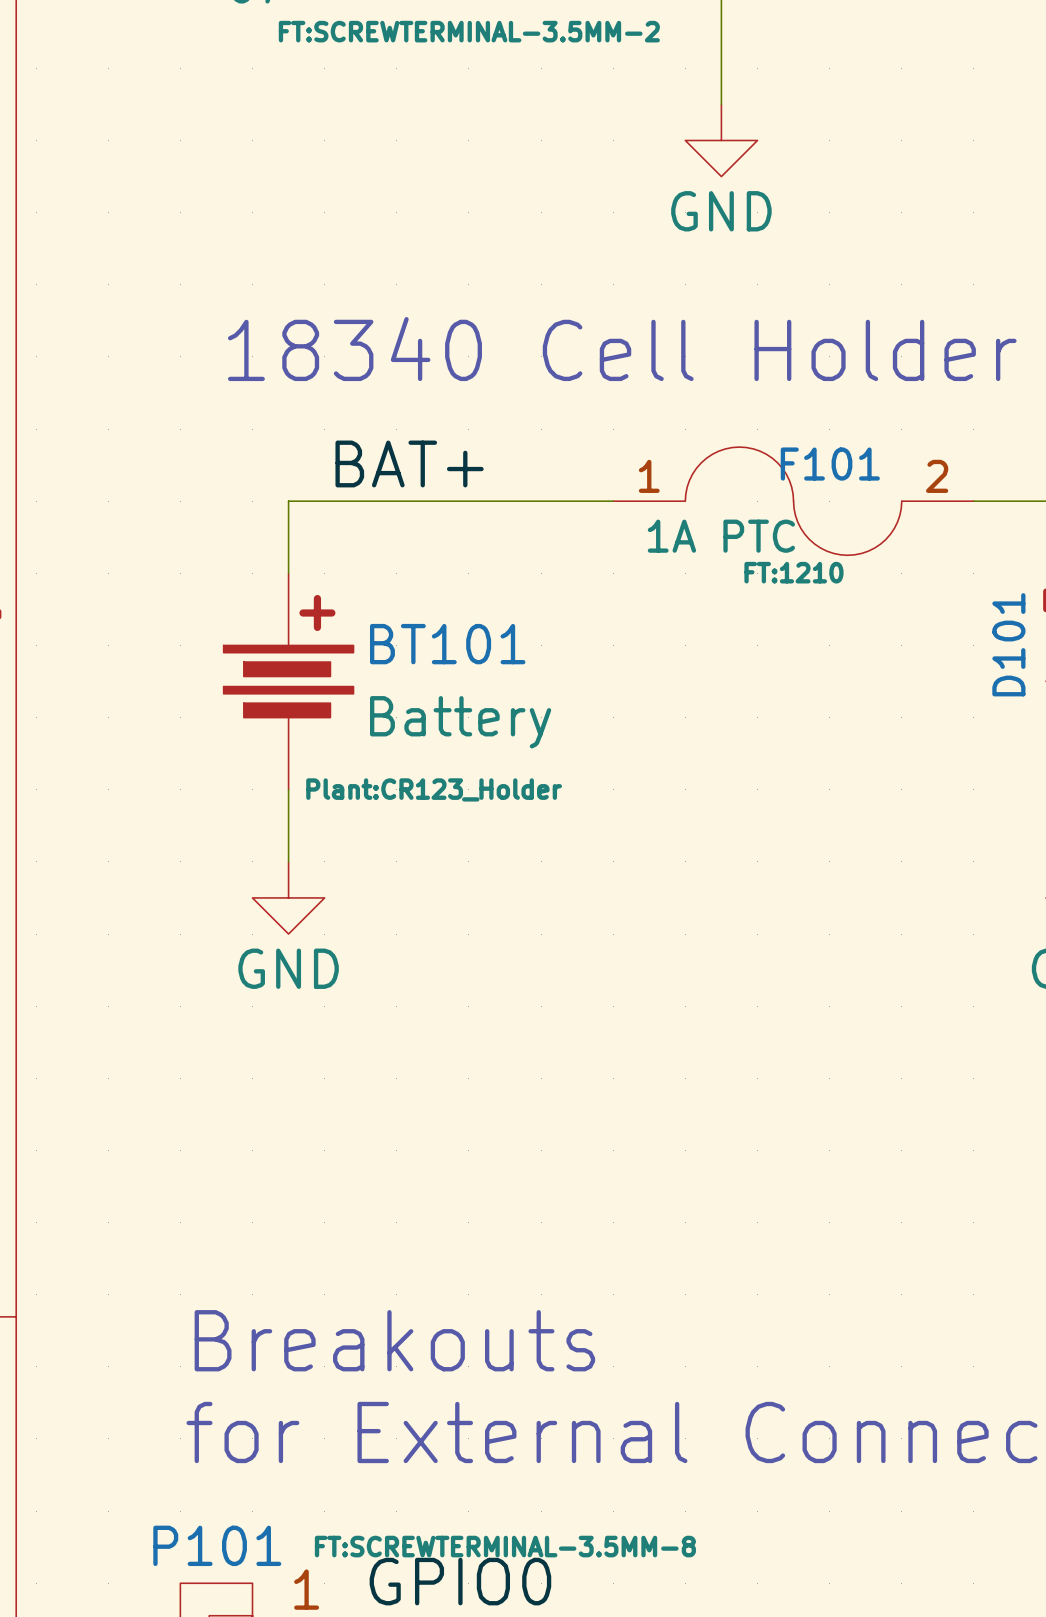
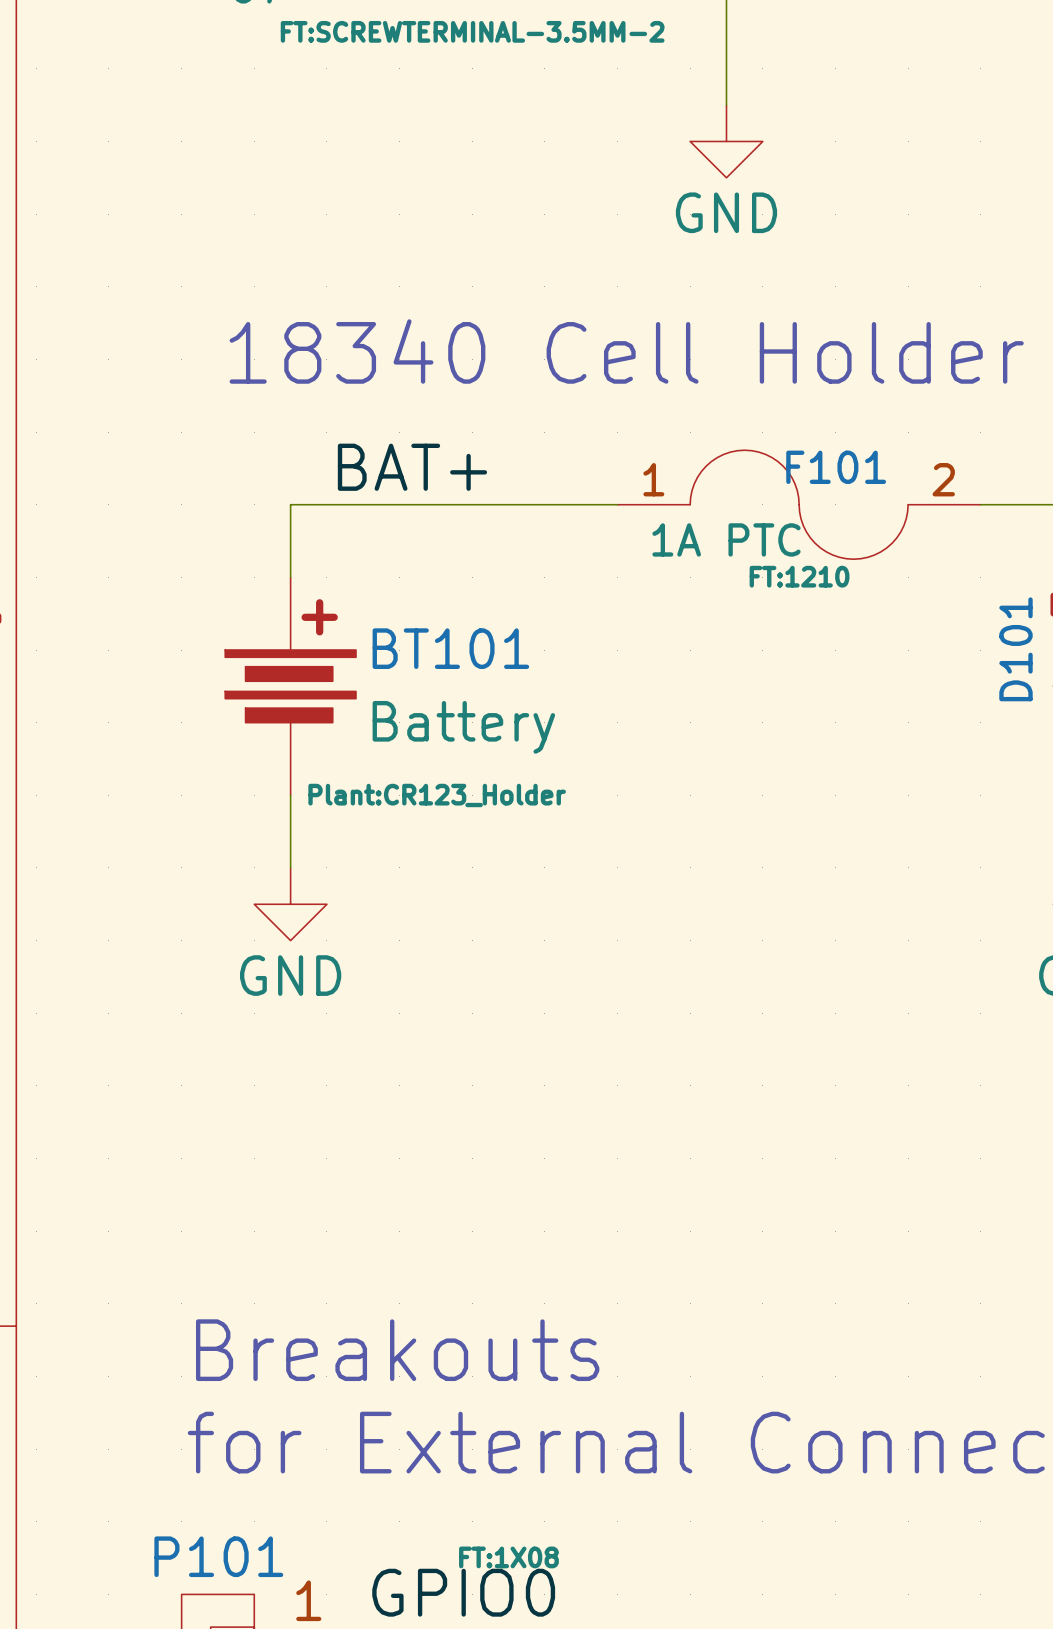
P101 text: FT:SCREWTERMINAL-3.5MM-8 (505, 1546) -> FT:1X08 (508, 1557)

